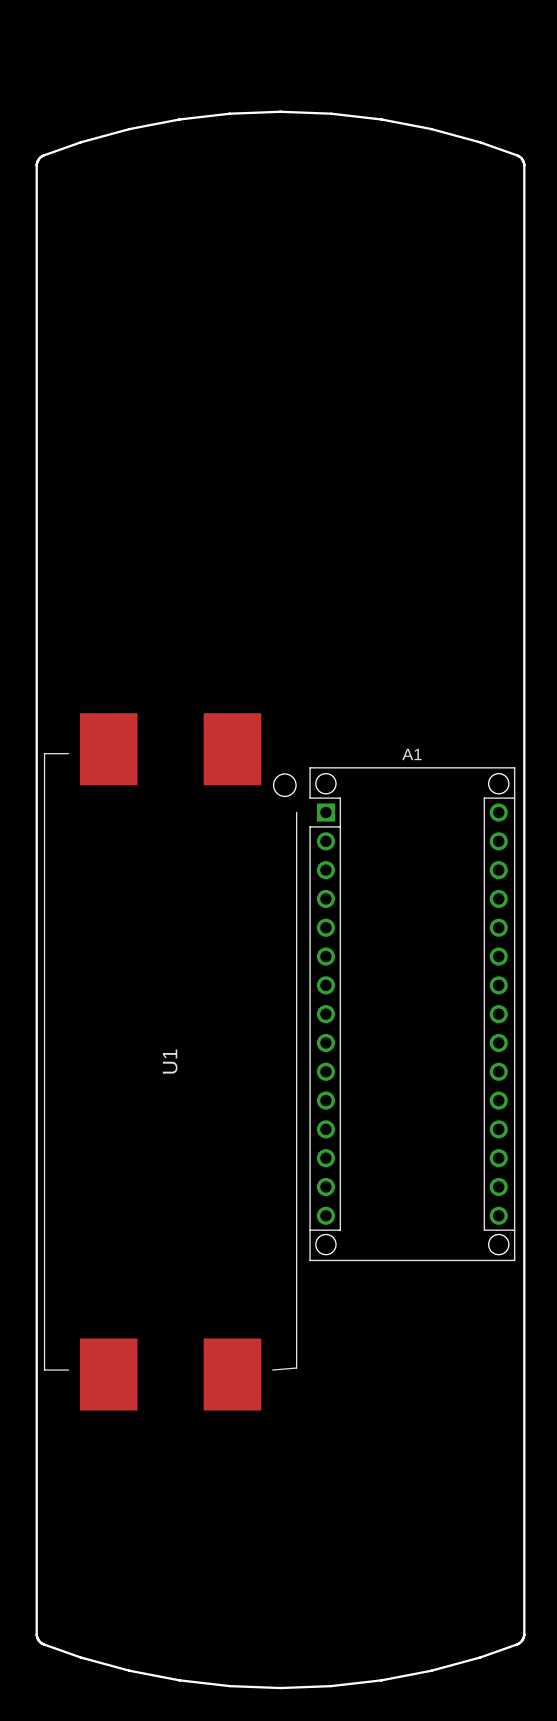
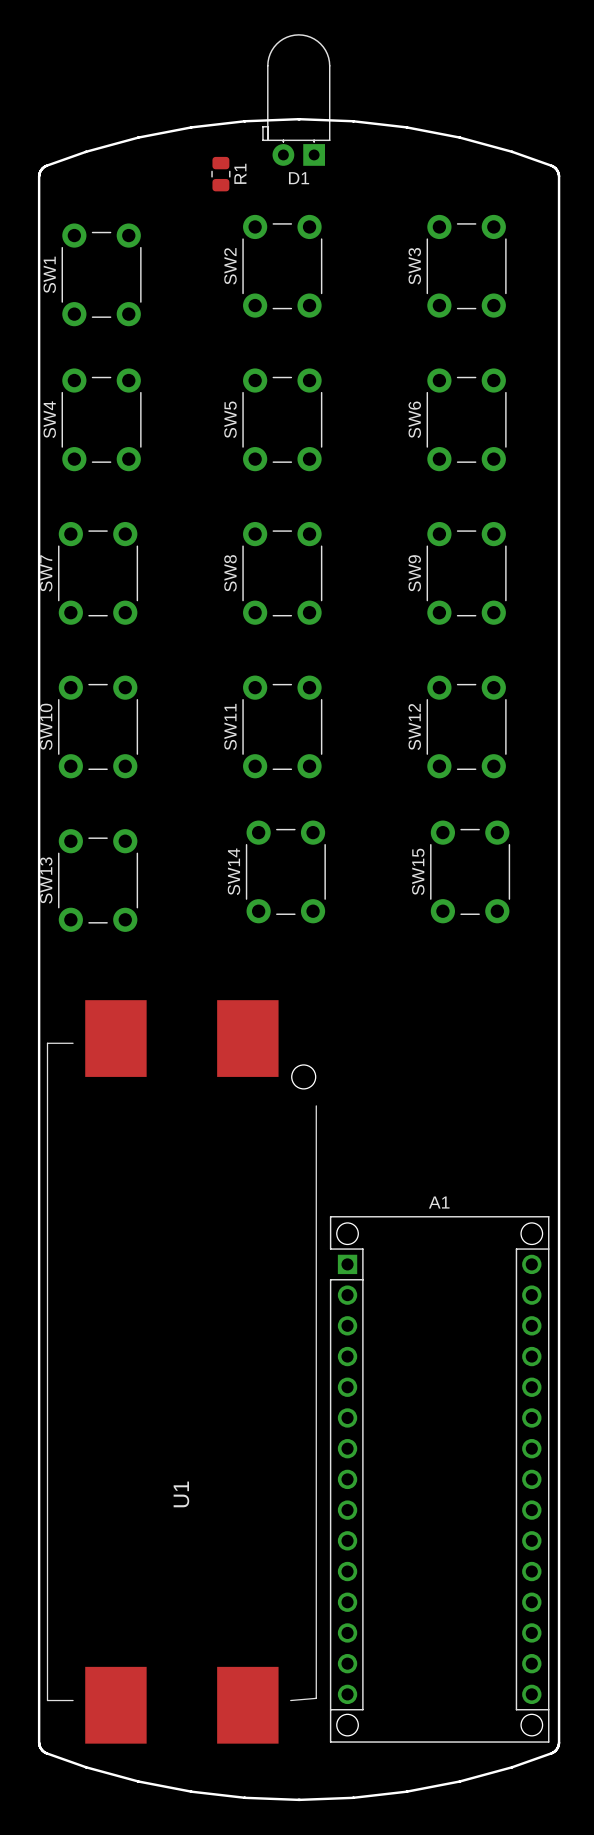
D1: none -> (296, 99)
R1: none -> (220, 174)
SW2: none -> (282, 266)
SW3: none -> (466, 266)
SW1: none -> (101, 274)
SW4: none -> (101, 419)
SW5: none -> (282, 419)
SW6: none -> (466, 419)
SW7: none -> (98, 573)
SW8: none -> (282, 573)
SW9: none -> (466, 573)
SW10: none -> (98, 726)
SW11: none -> (282, 726)
SW12: none -> (466, 726)
SW14: none -> (285, 871)
SW15: none -> (470, 871)
SW13: none -> (98, 880)
A1 position: (412, 1014) -> (439, 1479)
U1 position: (170, 1061) -> (181, 1371)
U1 name position: U1 (170, 1061) -> U1 (181, 1494)

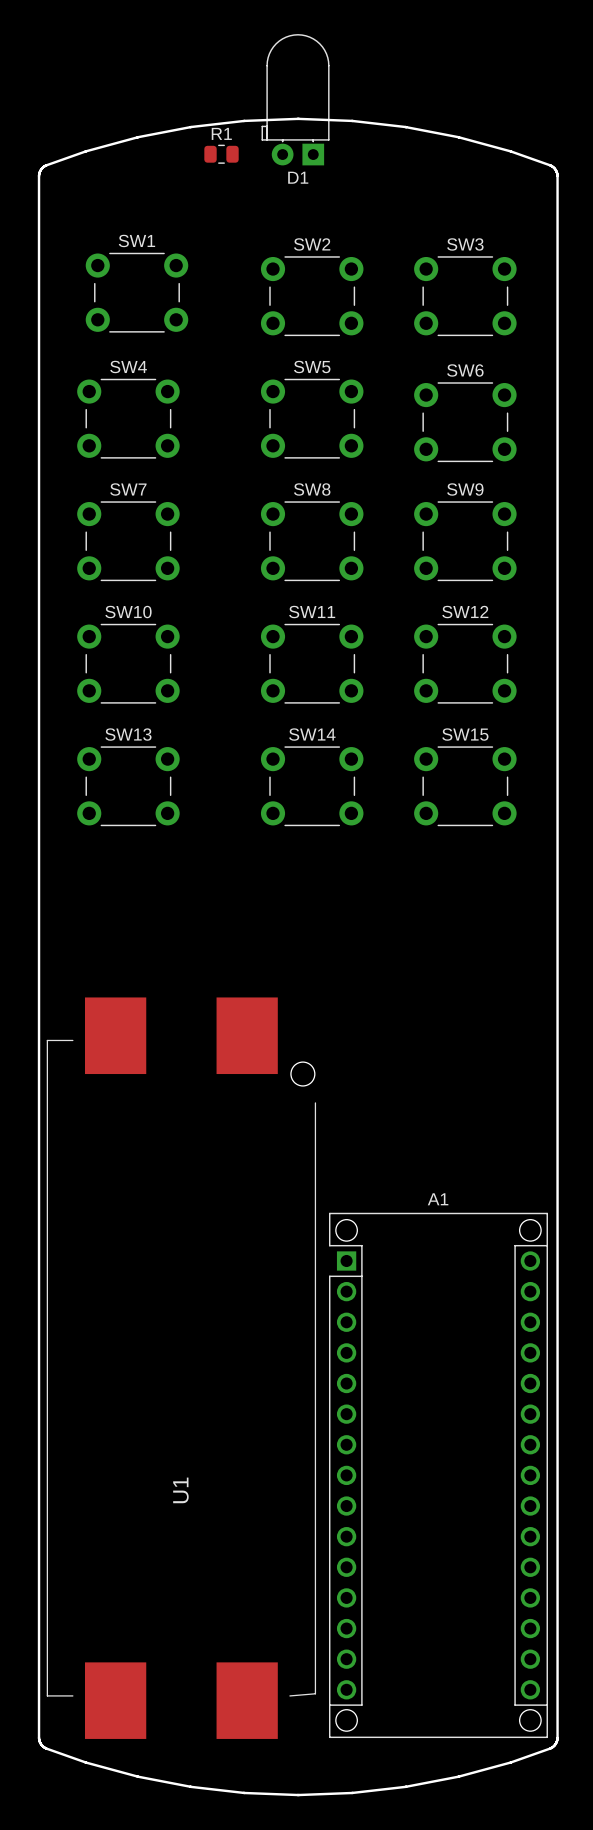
R1 name position: R1 (240, 173) -> R1 (221, 133)
R1 rotation: 0° (220, 174) -> 90° clockwise (221, 154)
SW2 rotation: 0° (282, 266) -> 90° clockwise (312, 296)
SW3 rotation: 0° (466, 266) -> 90° clockwise (465, 296)
SW1 rotation: 0° (101, 274) -> 90° clockwise (136, 292)
SW4 rotation: 0° (101, 419) -> 90° clockwise (128, 418)
SW5 rotation: 0° (282, 419) -> 90° clockwise (312, 418)
SW6 rotation: 0° (466, 419) -> 90° clockwise (465, 422)
SW7 rotation: 0° (98, 573) -> 90° clockwise (128, 541)
SW8 rotation: 0° (282, 573) -> 90° clockwise (312, 541)
SW9 rotation: 0° (466, 573) -> 90° clockwise (465, 541)
SW10 rotation: 0° (98, 726) -> 90° clockwise (128, 663)
SW10 position: (98, 726) -> (128, 663)
SW11 rotation: 0° (282, 726) -> 90° clockwise (312, 663)
SW11 position: (282, 726) -> (312, 663)
SW12 rotation: 0° (466, 726) -> 90° clockwise (465, 663)
SW14 rotation: 0° (285, 871) -> 90° clockwise (312, 786)
SW14 position: (285, 871) -> (312, 786)
SW15 rotation: 0° (470, 871) -> 90° clockwise (465, 786)
SW15 position: (470, 871) -> (465, 786)
SW13 rotation: 0° (98, 880) -> 90° clockwise (128, 786)
SW13 position: (98, 880) -> (128, 786)

